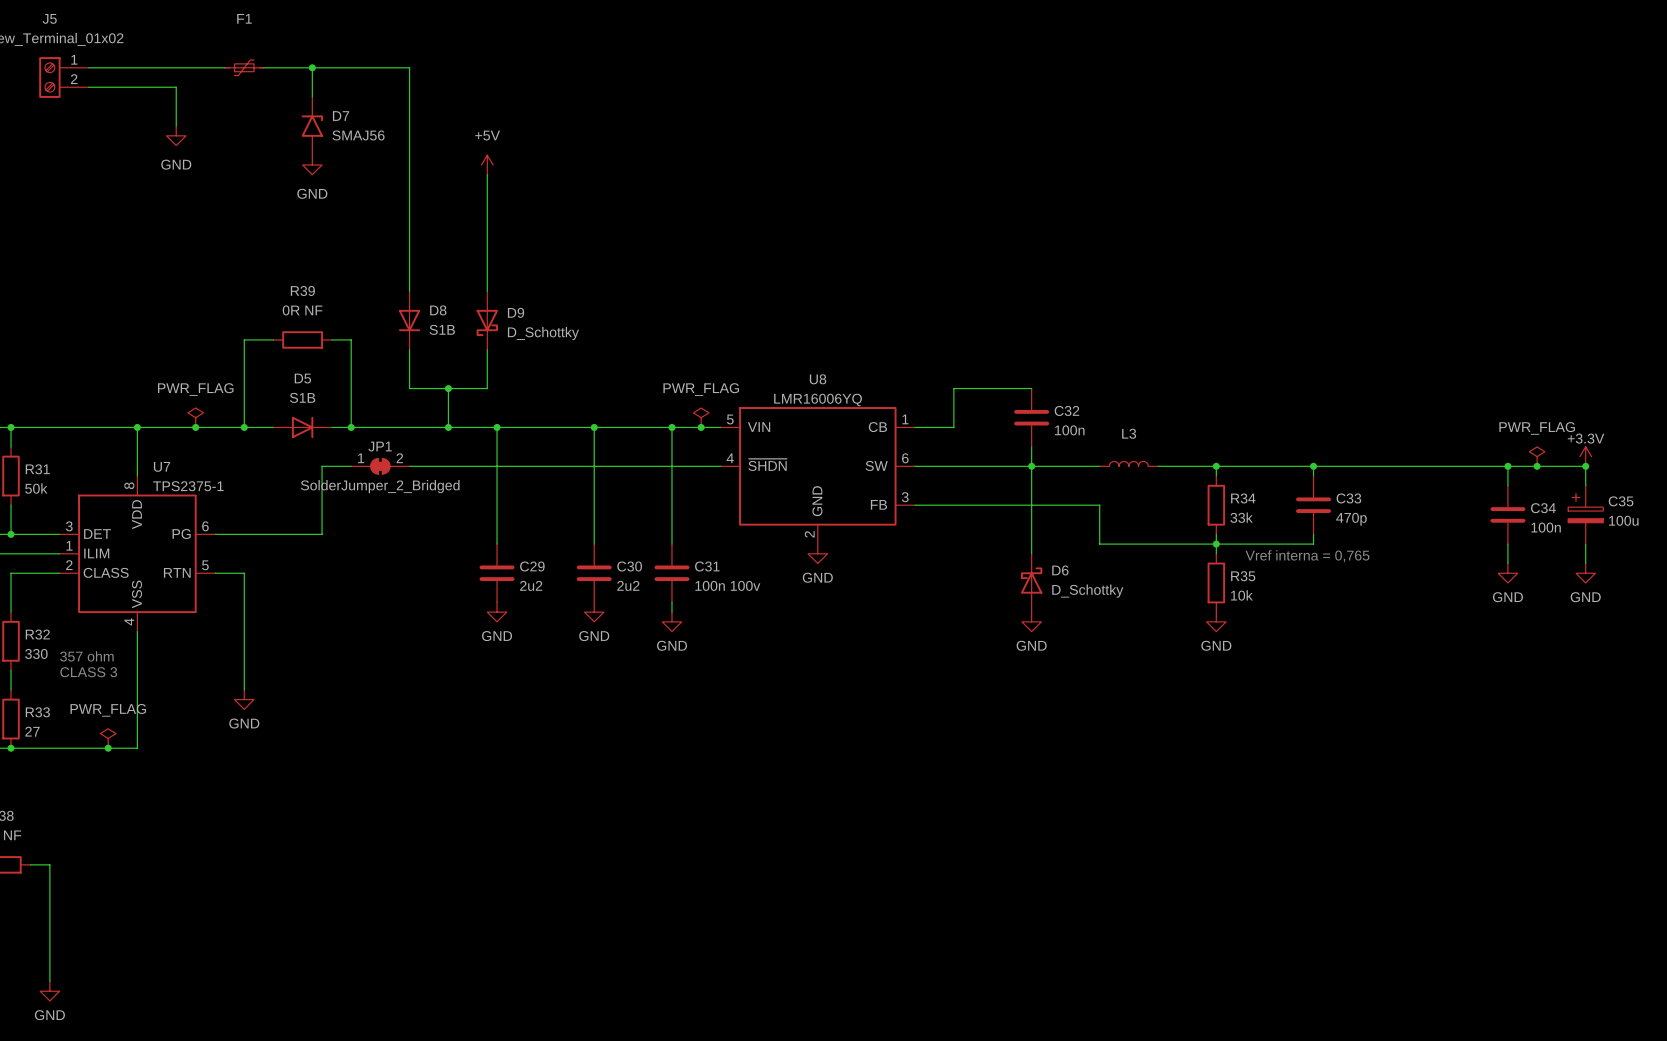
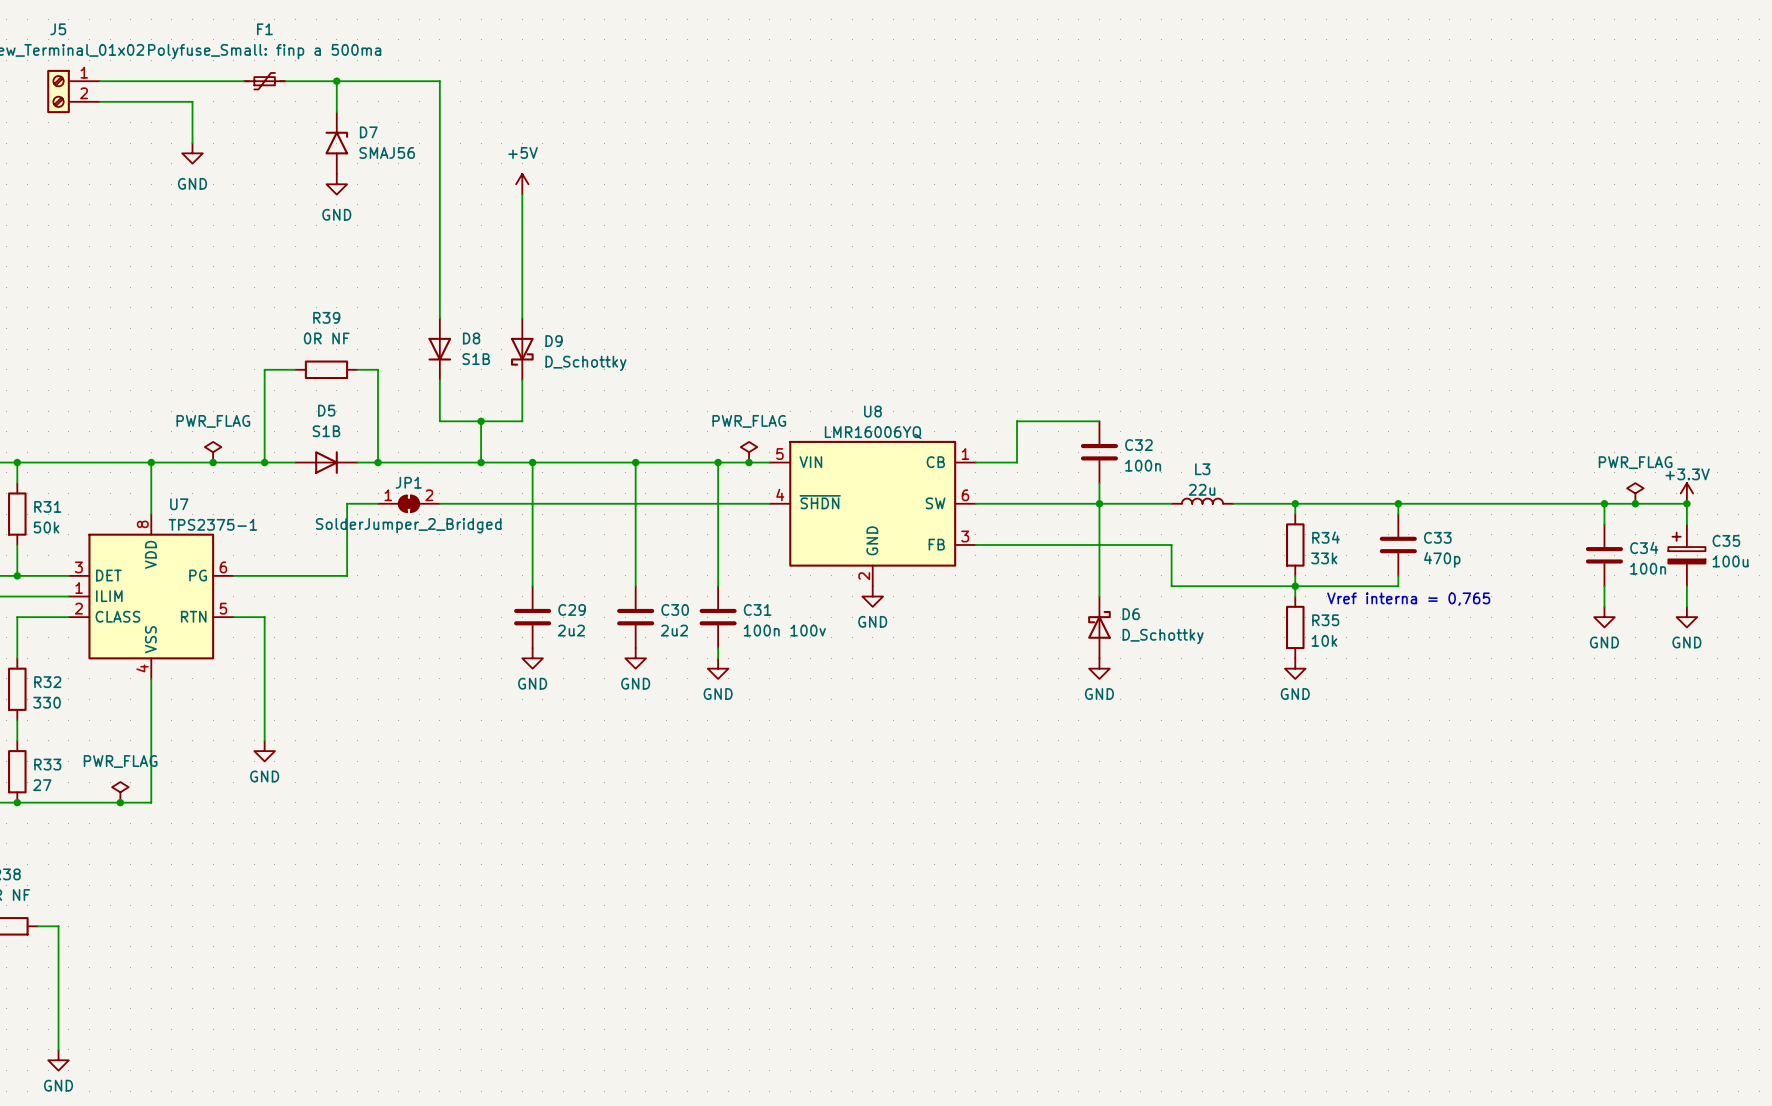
F1 value: none -> Polyfuse_Small: finp a 500ma (264, 51)
L3 value: none -> 22u (1202, 489)
text: 357 ohm (86, 656) -> none
text: CLASS 3 (88, 672) -> none

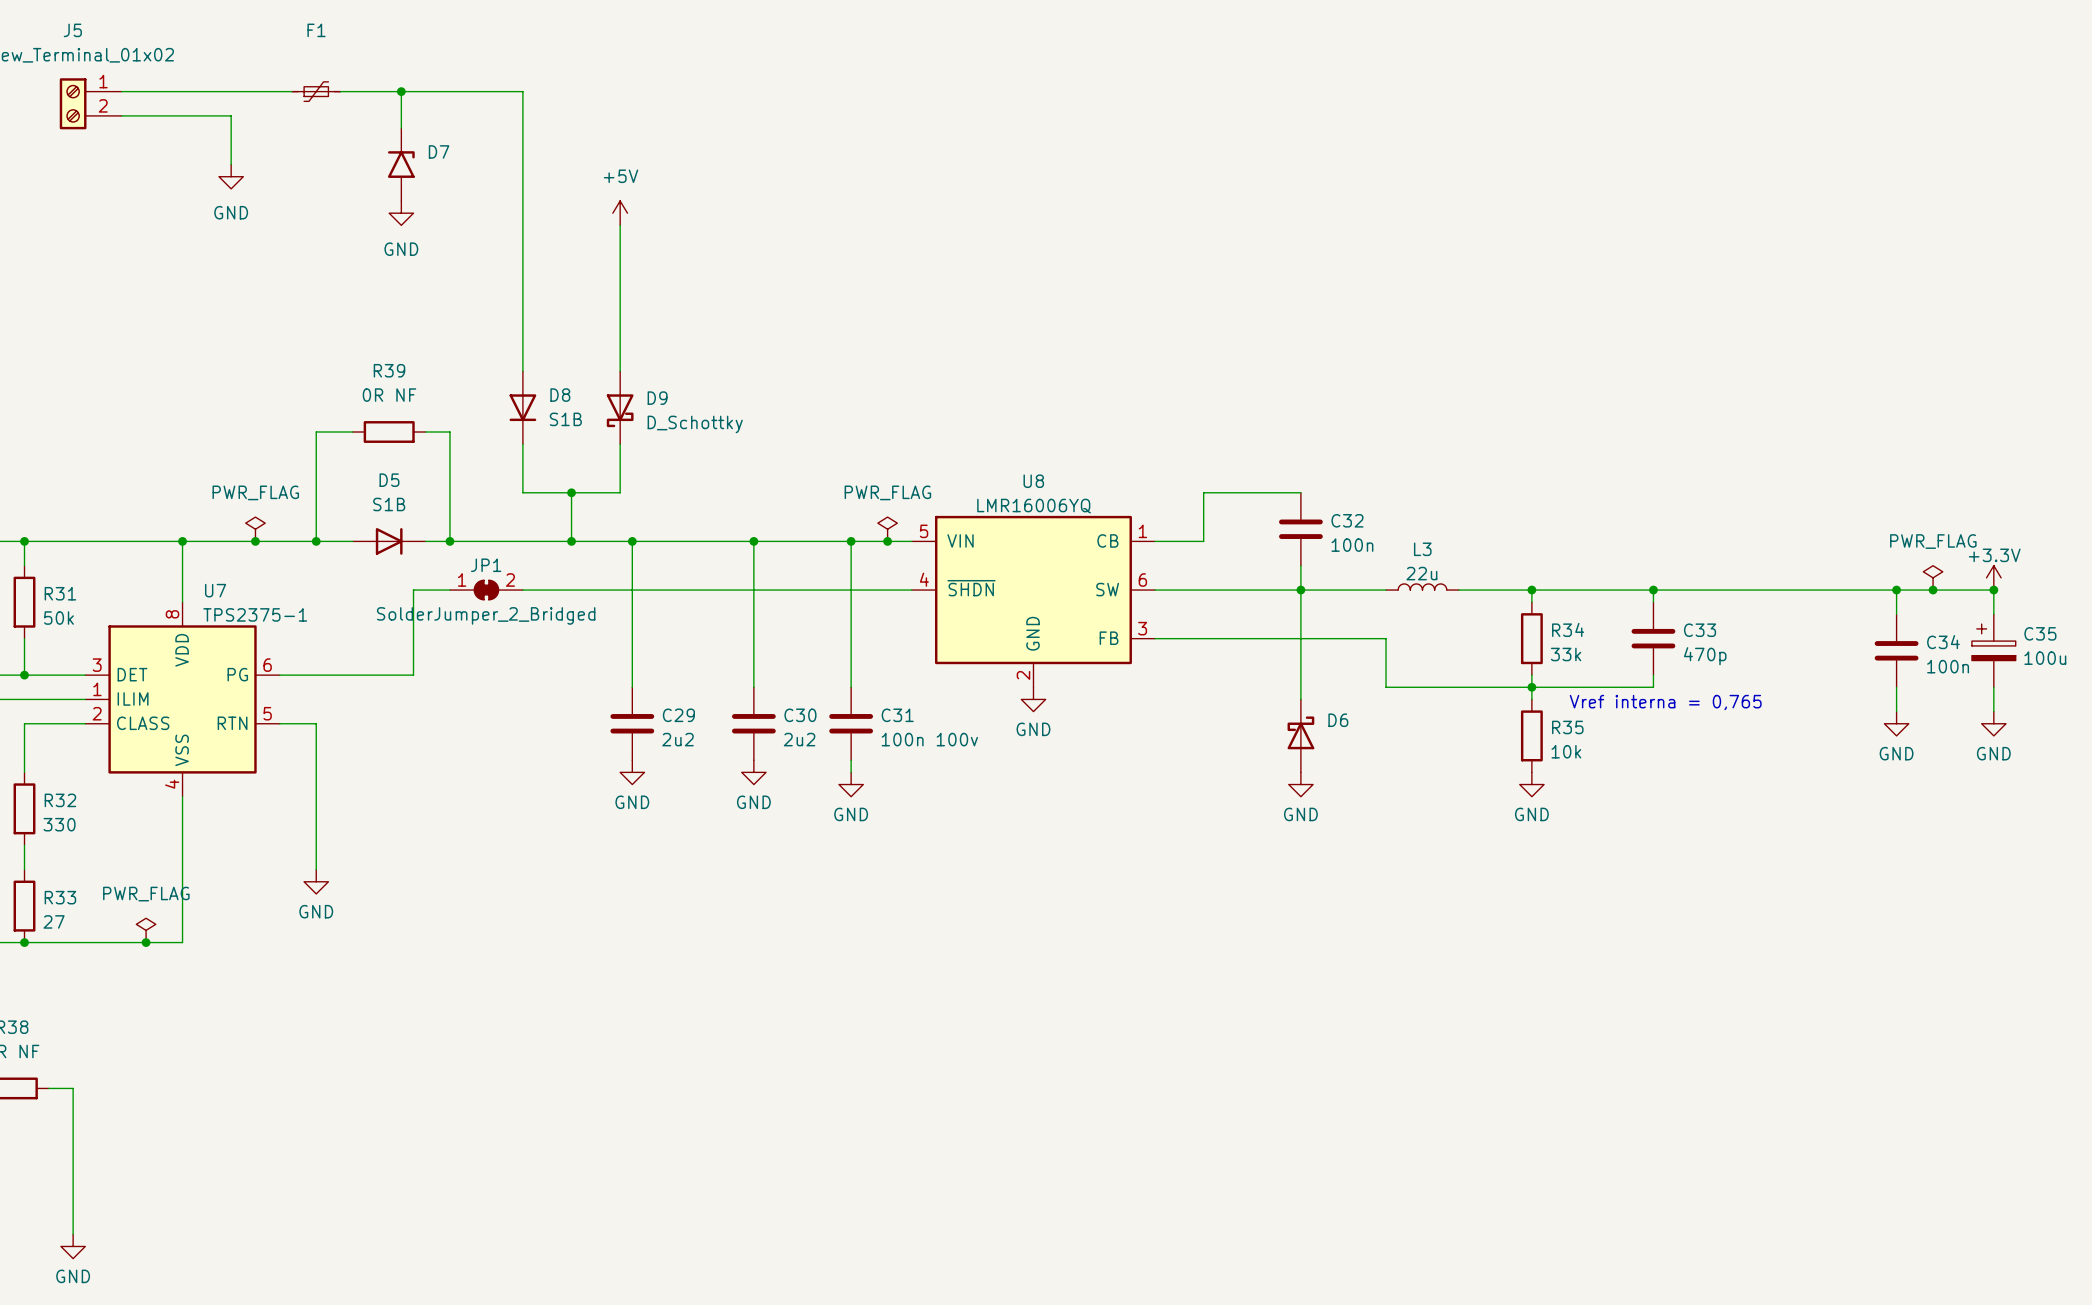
F1 value: Polyfuse_Small: finp a 500ma (264, 51) -> none
D7 value: SMAJ56 (387, 152) -> none
D6 value: D_Schottky (1163, 636) -> none

